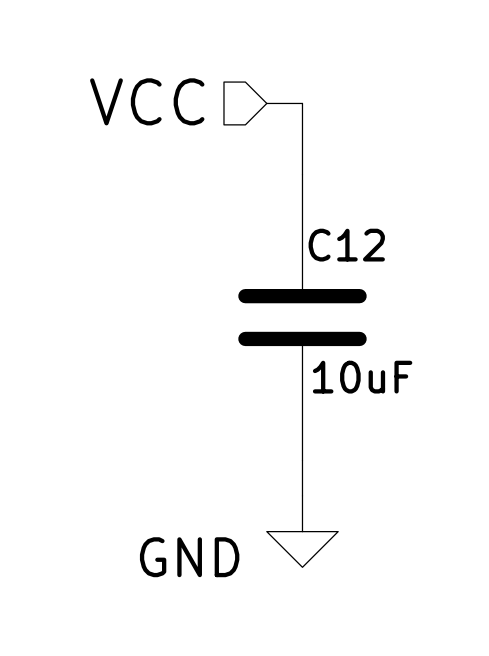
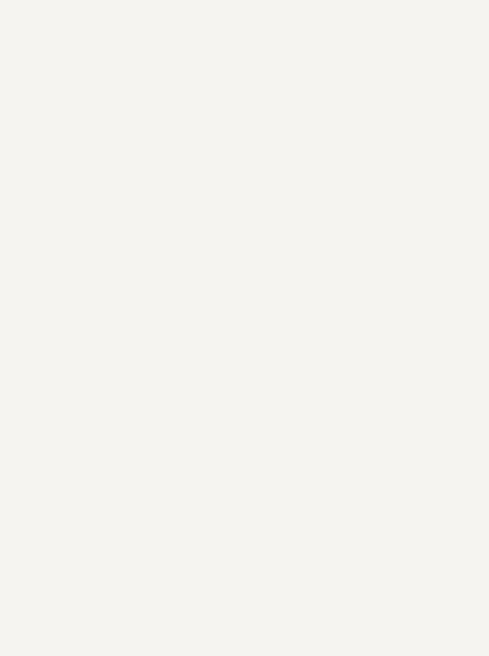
hierarchical label: VCC (147, 101) -> none
wire: (266, 103) (302, 103) (302, 174) -> none
C12: 10uF (302, 317) -> none
wire: (302, 460) (302, 495) -> none
power symbol: GND (302, 531) -> none

